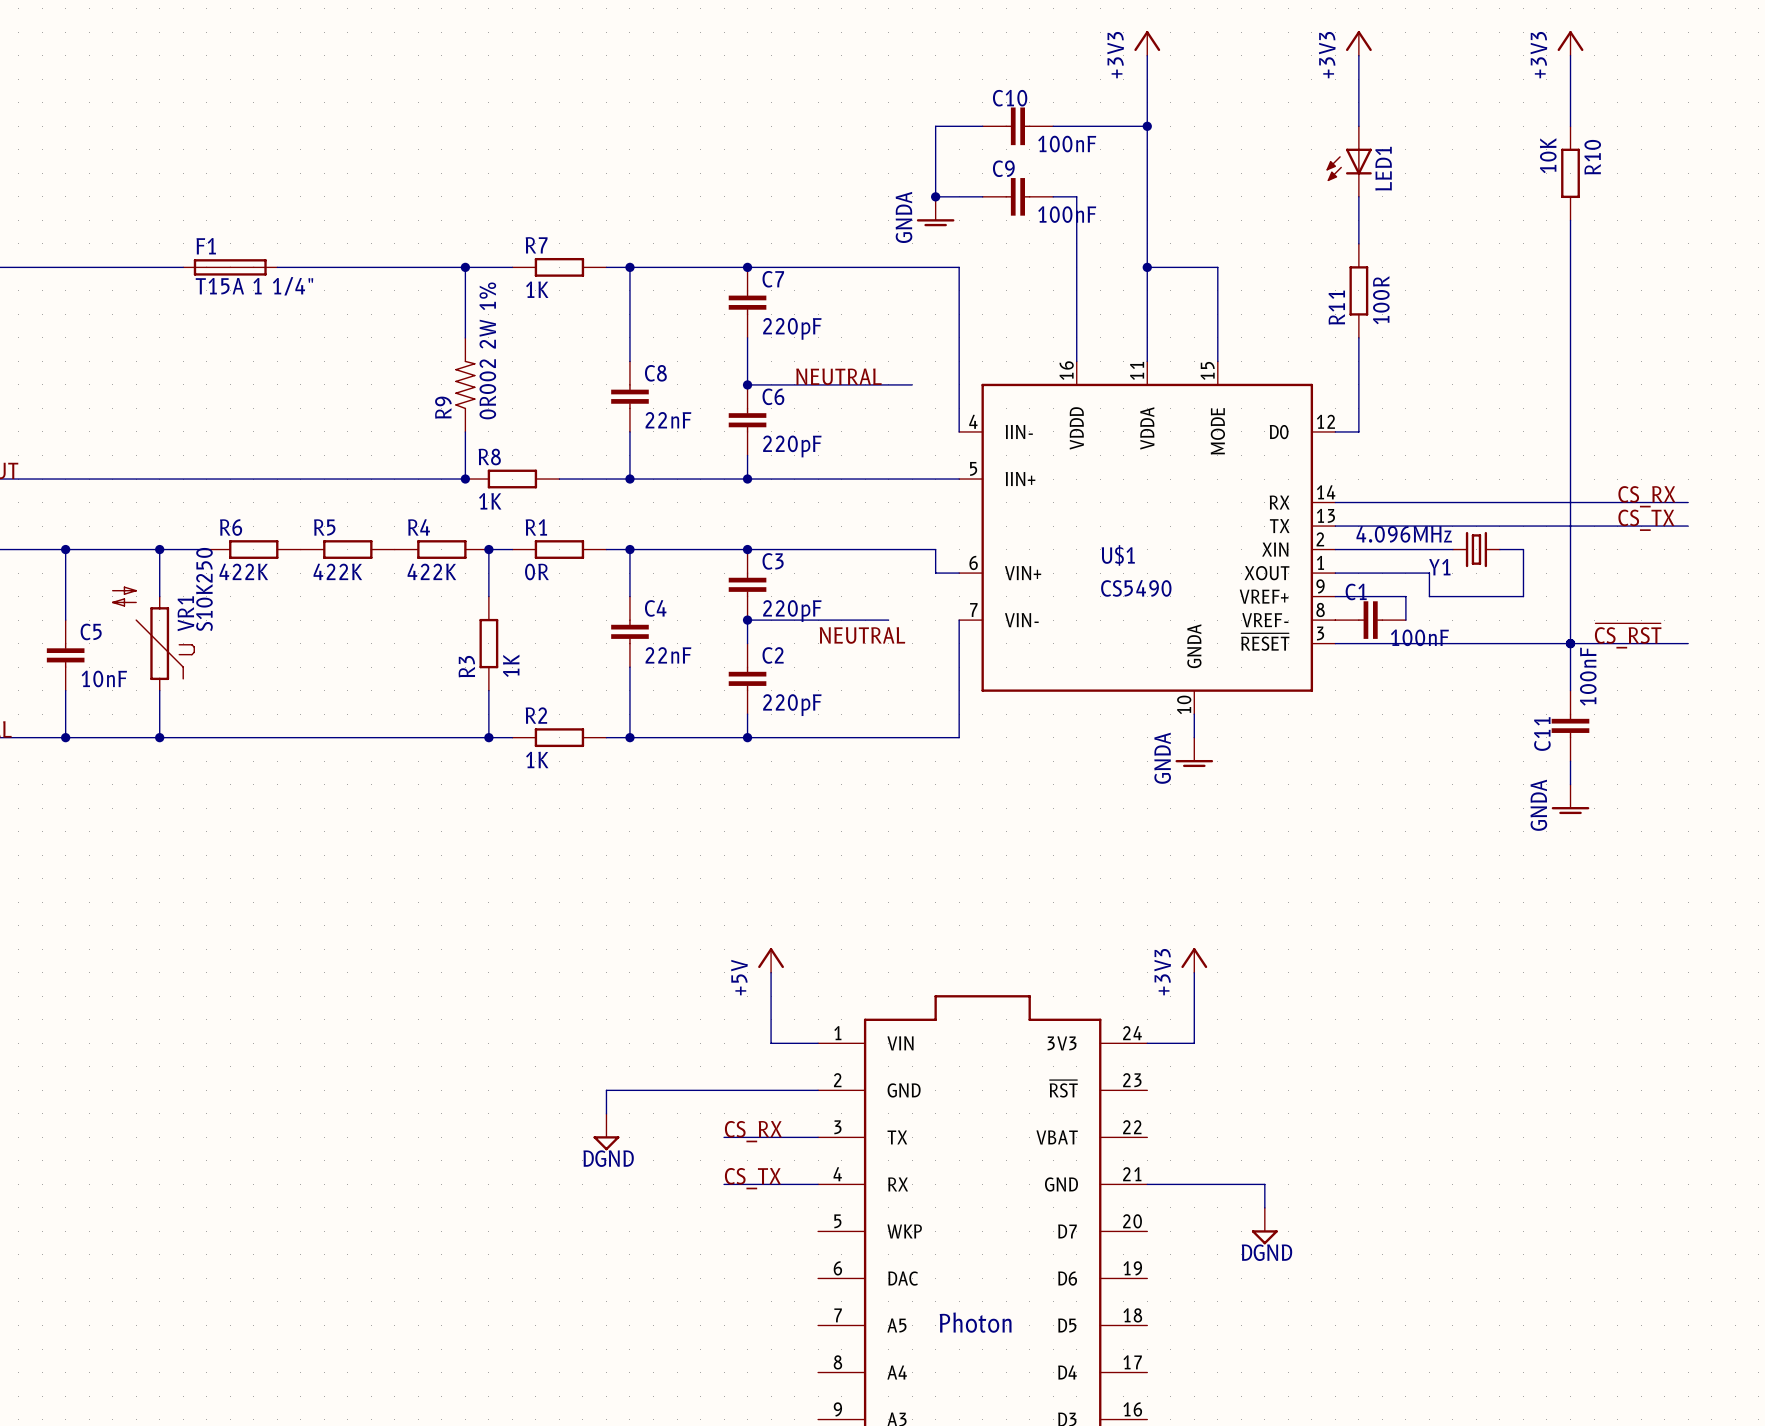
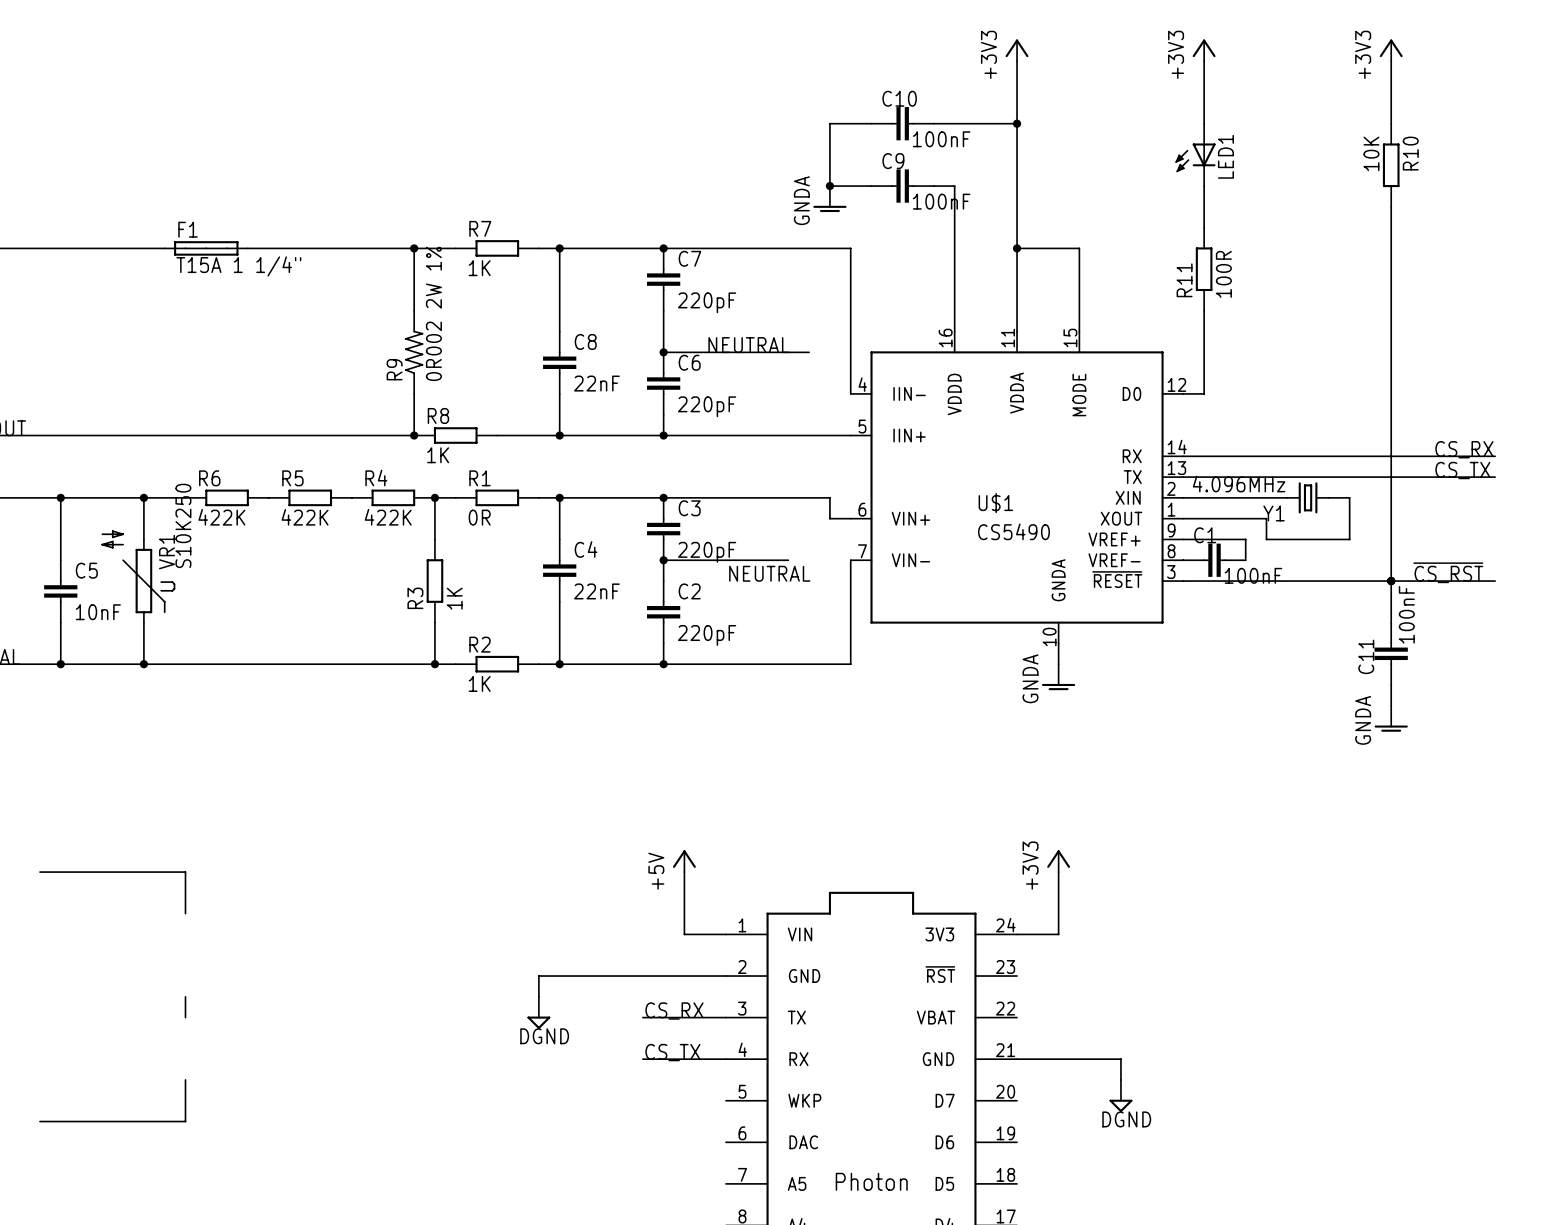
wire: none -> (39, 872) (185, 872) (185, 913)
wire: none -> (185, 996) (185, 1017)
wire: none -> (185, 1079) (185, 1121) (39, 1121)

